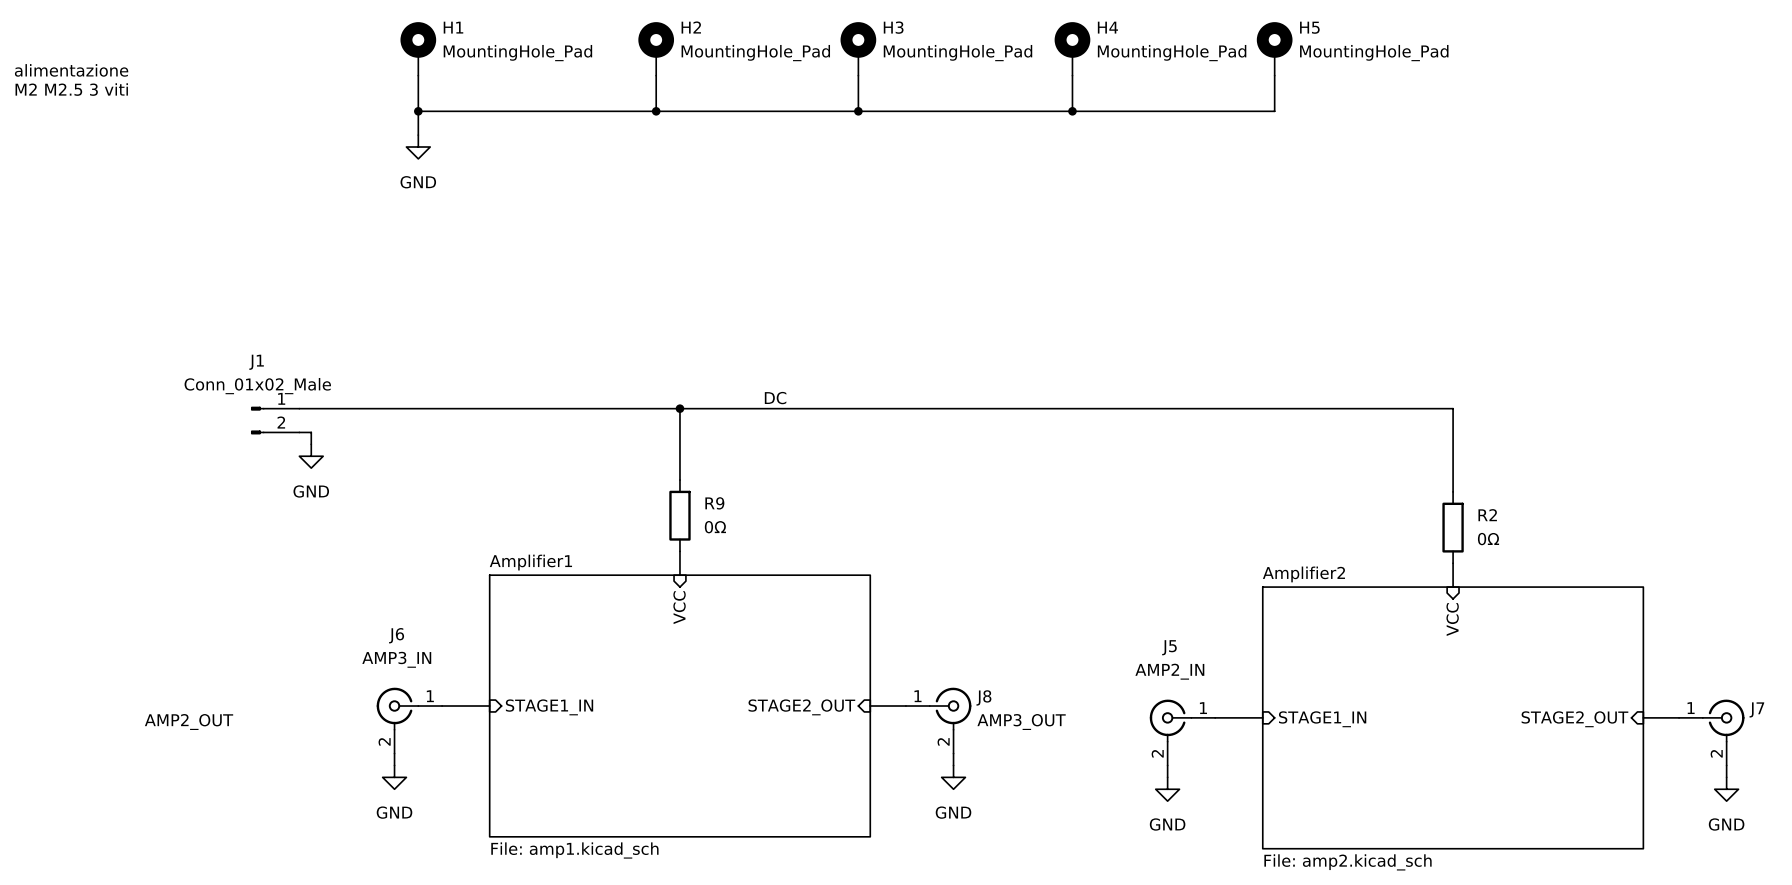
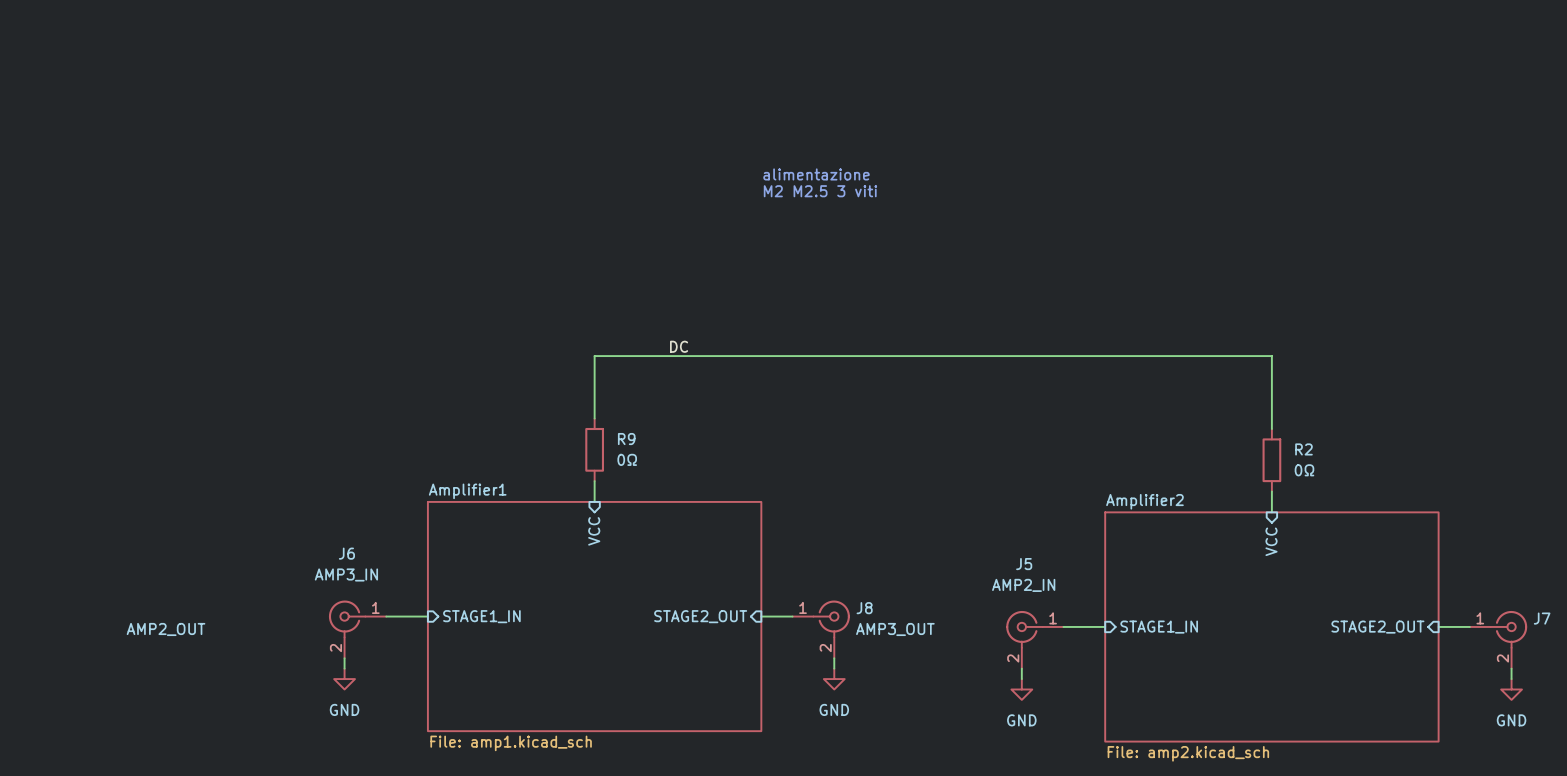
H1: MountingHole_Pad (418, 48) -> none
H2: MountingHole_Pad (656, 48) -> none
H3: MountingHole_Pad (858, 48) -> none
H4: MountingHole_Pad (1072, 48) -> none
H5: MountingHole_Pad (1274, 48) -> none
text: alimentazione (71, 70) -> none
wire: (418, 75) (418, 135) -> none
wire: (656, 75) (656, 111) -> none
wire: (858, 75) (858, 111) -> none
wire: (1072, 75) (1072, 111) -> none
wire: (1274, 75) (1274, 111) (418, 111) -> none
text: M2 M2.5 3 viti (71, 89) -> none
junction: (418, 111) -> none
junction: (656, 111) -> none
junction: (858, 111) -> none
junction: (1072, 111) -> none
power symbol: GND (418, 147) -> none
text: none -> alimentazione (816, 174)
text: none -> M2 M2.5 3 viti (820, 191)
wire: (299, 408) (679, 408) -> none
junction: (679, 408) -> none
J1: Conn_01x02_Male (275, 420) -> none
wire: (299, 432) (311, 432) (311, 444) -> none
power symbol: GND (311, 456) -> none

